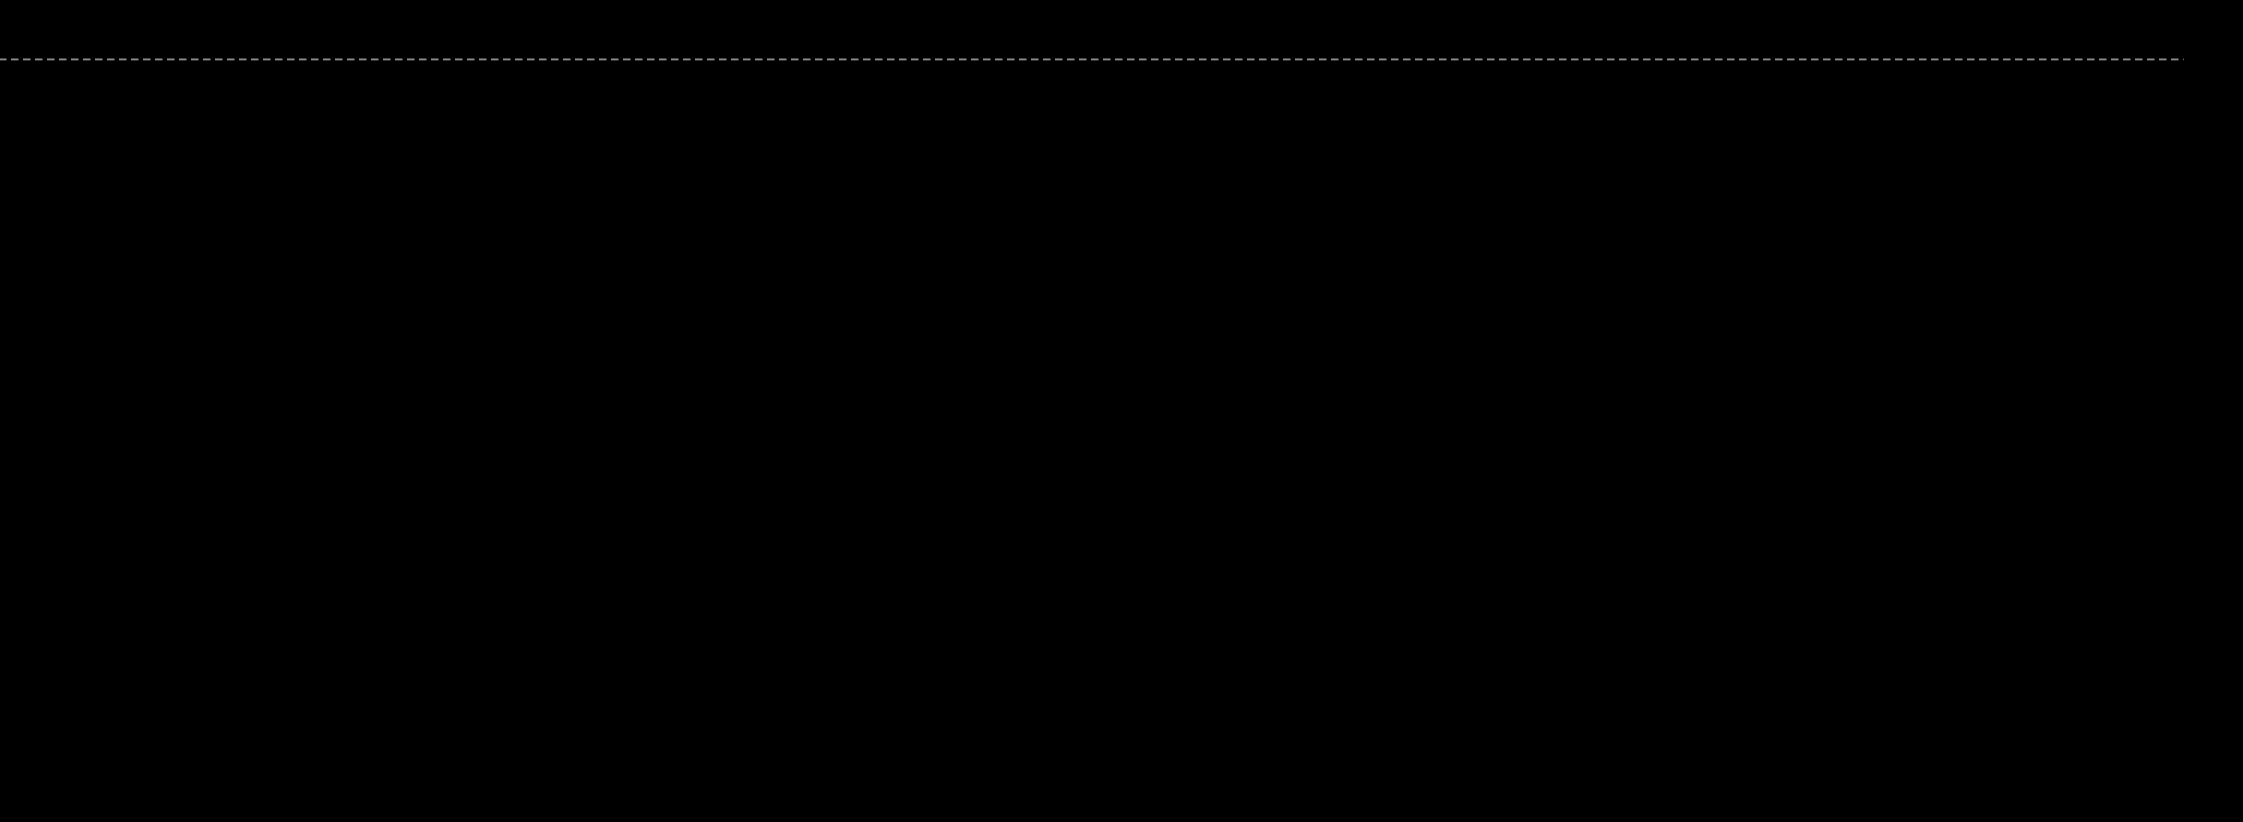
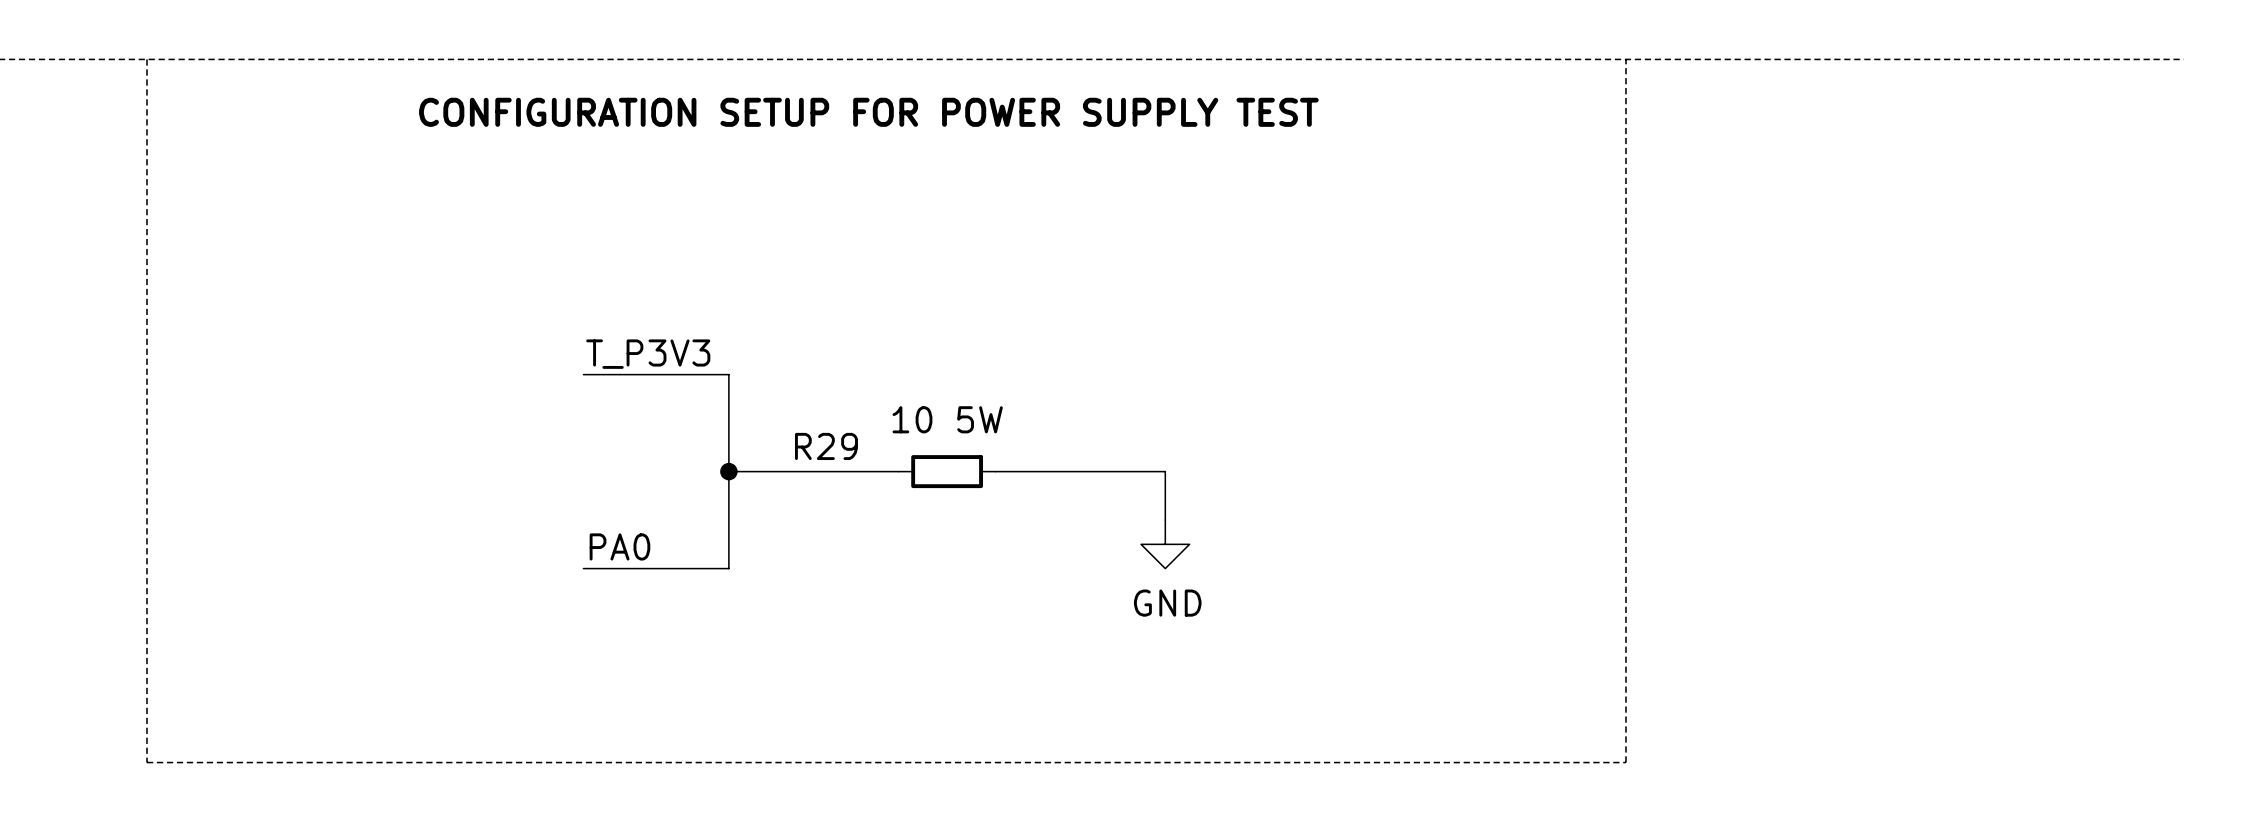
line: none -> (146, 59) (146, 762) (1625, 762) (1625, 59)
text: none -> CONFIGURATION SETUP FOR POWER SUPPLY TEST (868, 112)
label: none -> T_P3V3 (648, 354)
wire: none -> (583, 374) (728, 374) (728, 568) (583, 568)
wire: none -> (728, 471) (898, 471)
junction: none -> (728, 471)
R29: none -> 10 5W (947, 471)
wire: none -> (995, 471) (1165, 471) (1165, 520)
power symbol: none -> GND (1165, 544)
label: none -> PA0 (619, 546)

